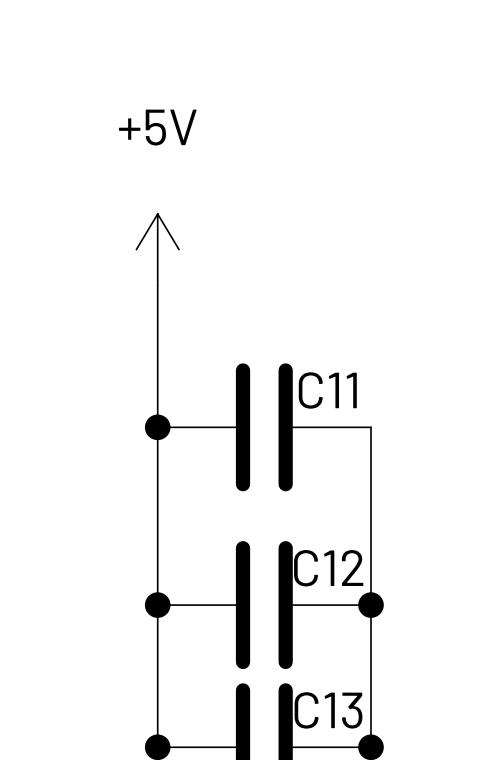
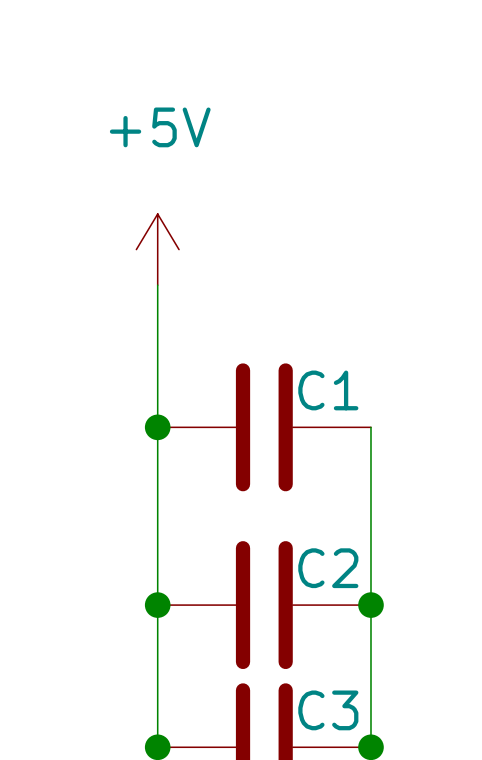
C11 name: C11 (327, 390) -> C1 (328, 390)
C12 name: C12 (328, 568) -> C2 (328, 568)
C13 name: C13 (328, 710) -> C3 (328, 710)

